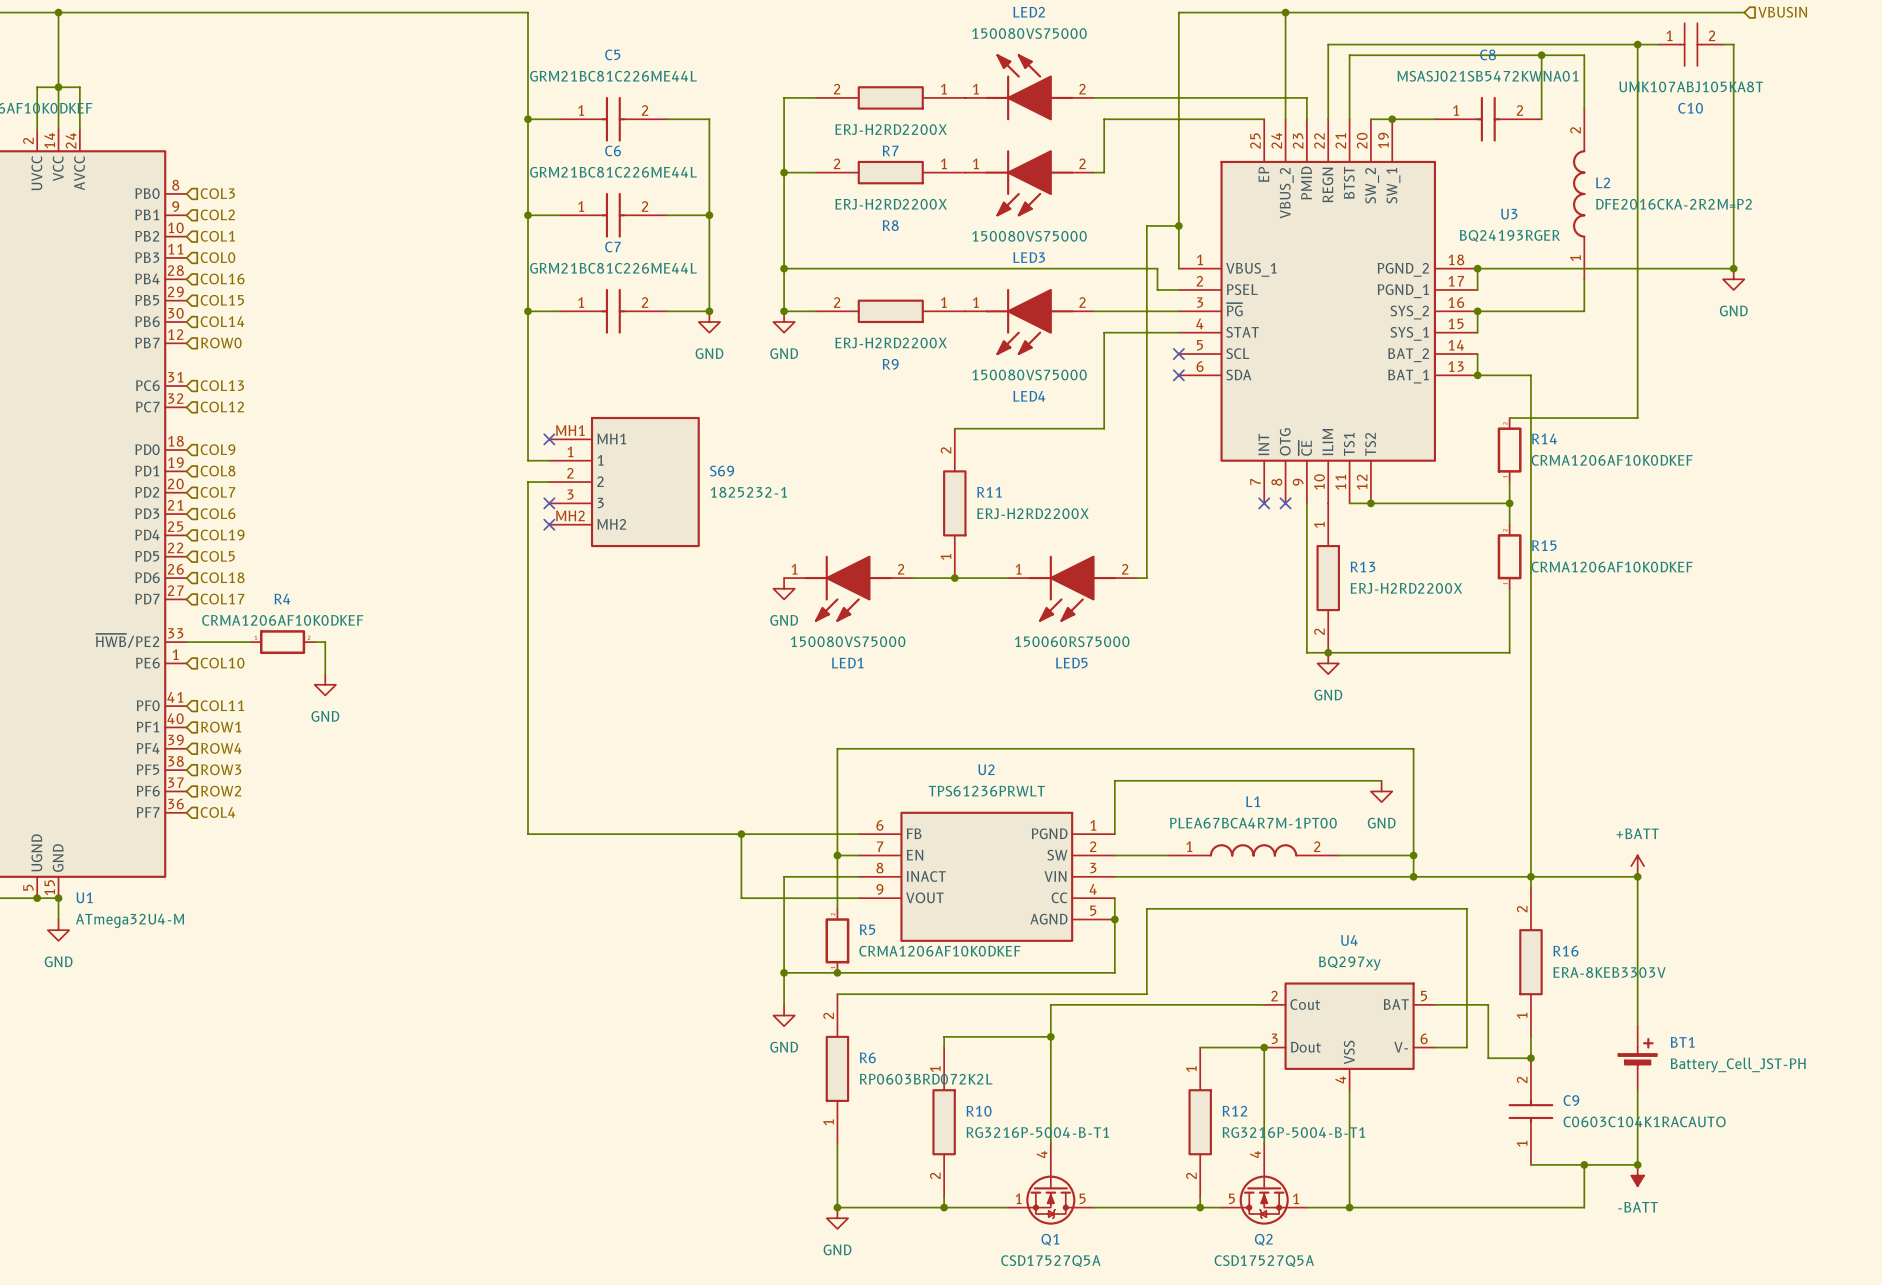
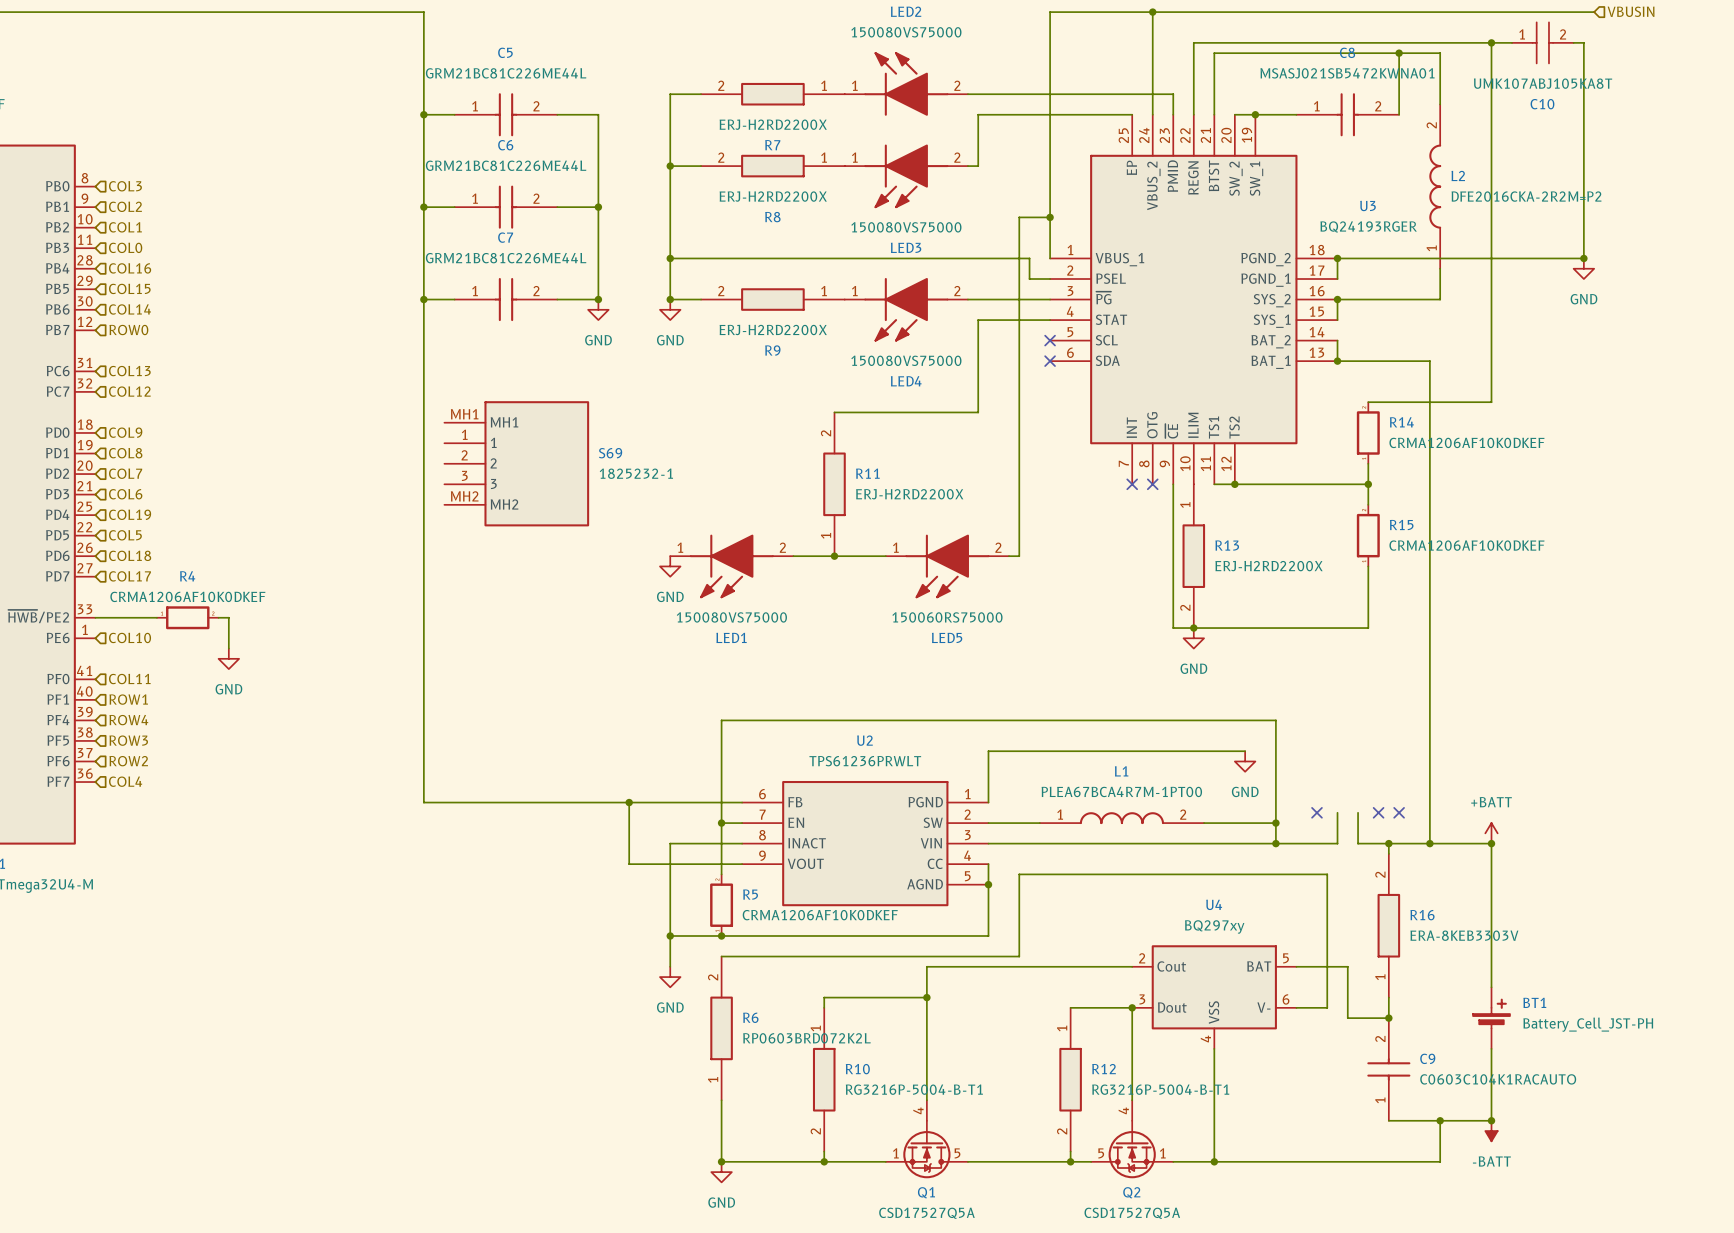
wire: (1530, 375) (1530, 876) -> (1388, 361) (1429, 361) (1429, 843)
no-connect mark: (549, 439) -> none
wire: (528, 460) (549, 460) -> (423, 443) (423, 463)
wire: (528, 482) (549, 482) -> none
no-connect mark: (549, 503) -> none
no-connect mark: (549, 524) -> none
no-connect mark: none -> (1316, 812)
wire: none -> (1358, 812) (1358, 843)
no-connect mark: none -> (1378, 812)
no-connect mark: none -> (1399, 812)
wire: (1477, 876) (1498, 876) -> (1337, 843) (1337, 812)
junction: none -> (1429, 843)

